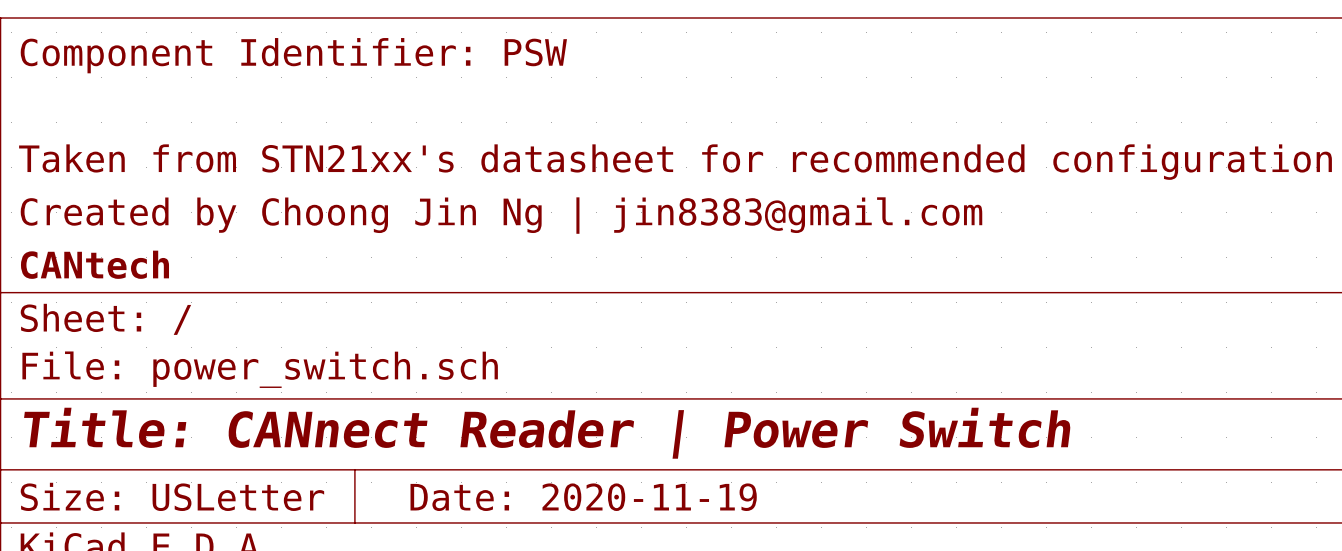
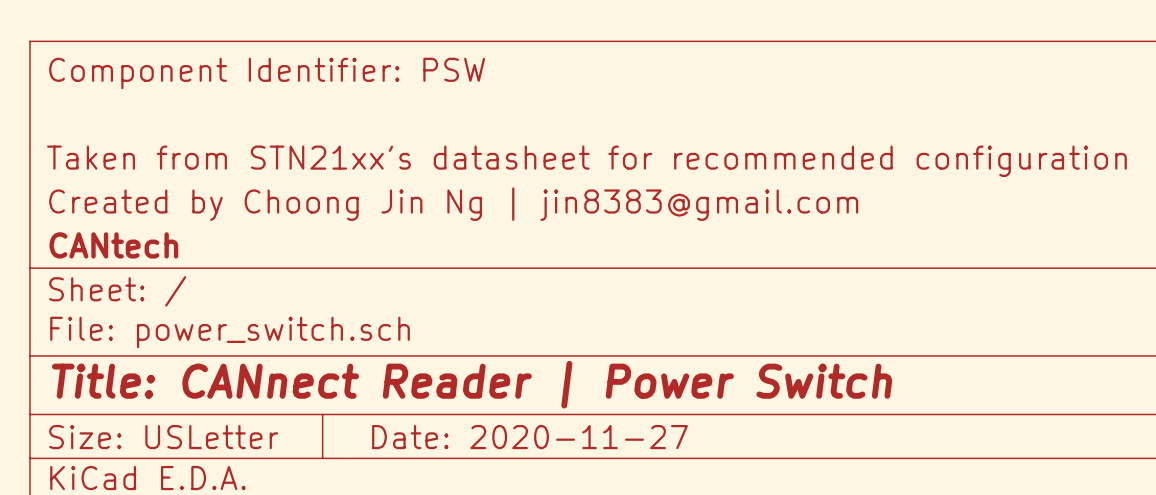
title block: Date: 2020-11-19 (583, 497) -> Date: 2020-11-27 (529, 437)

